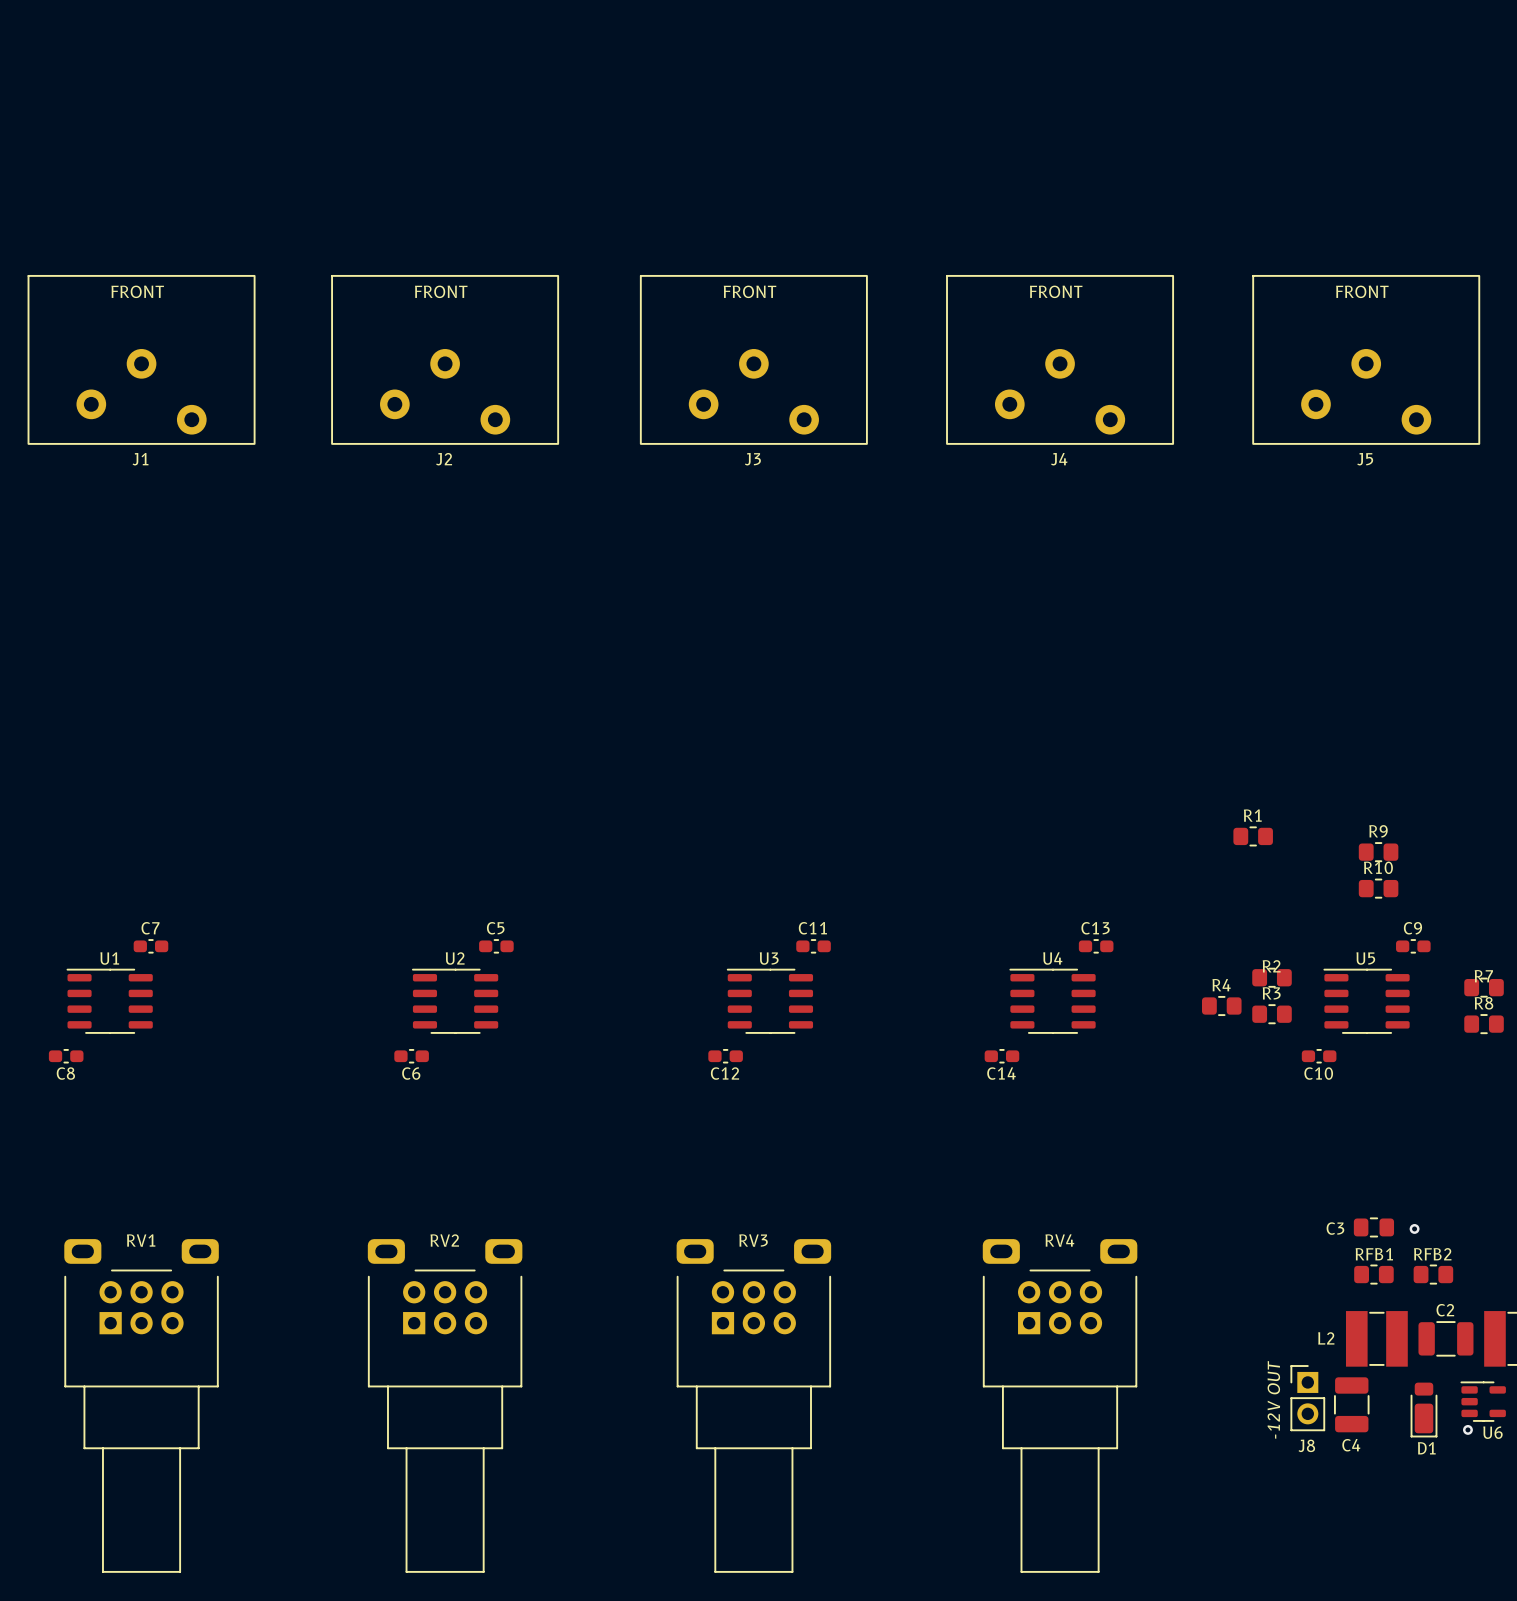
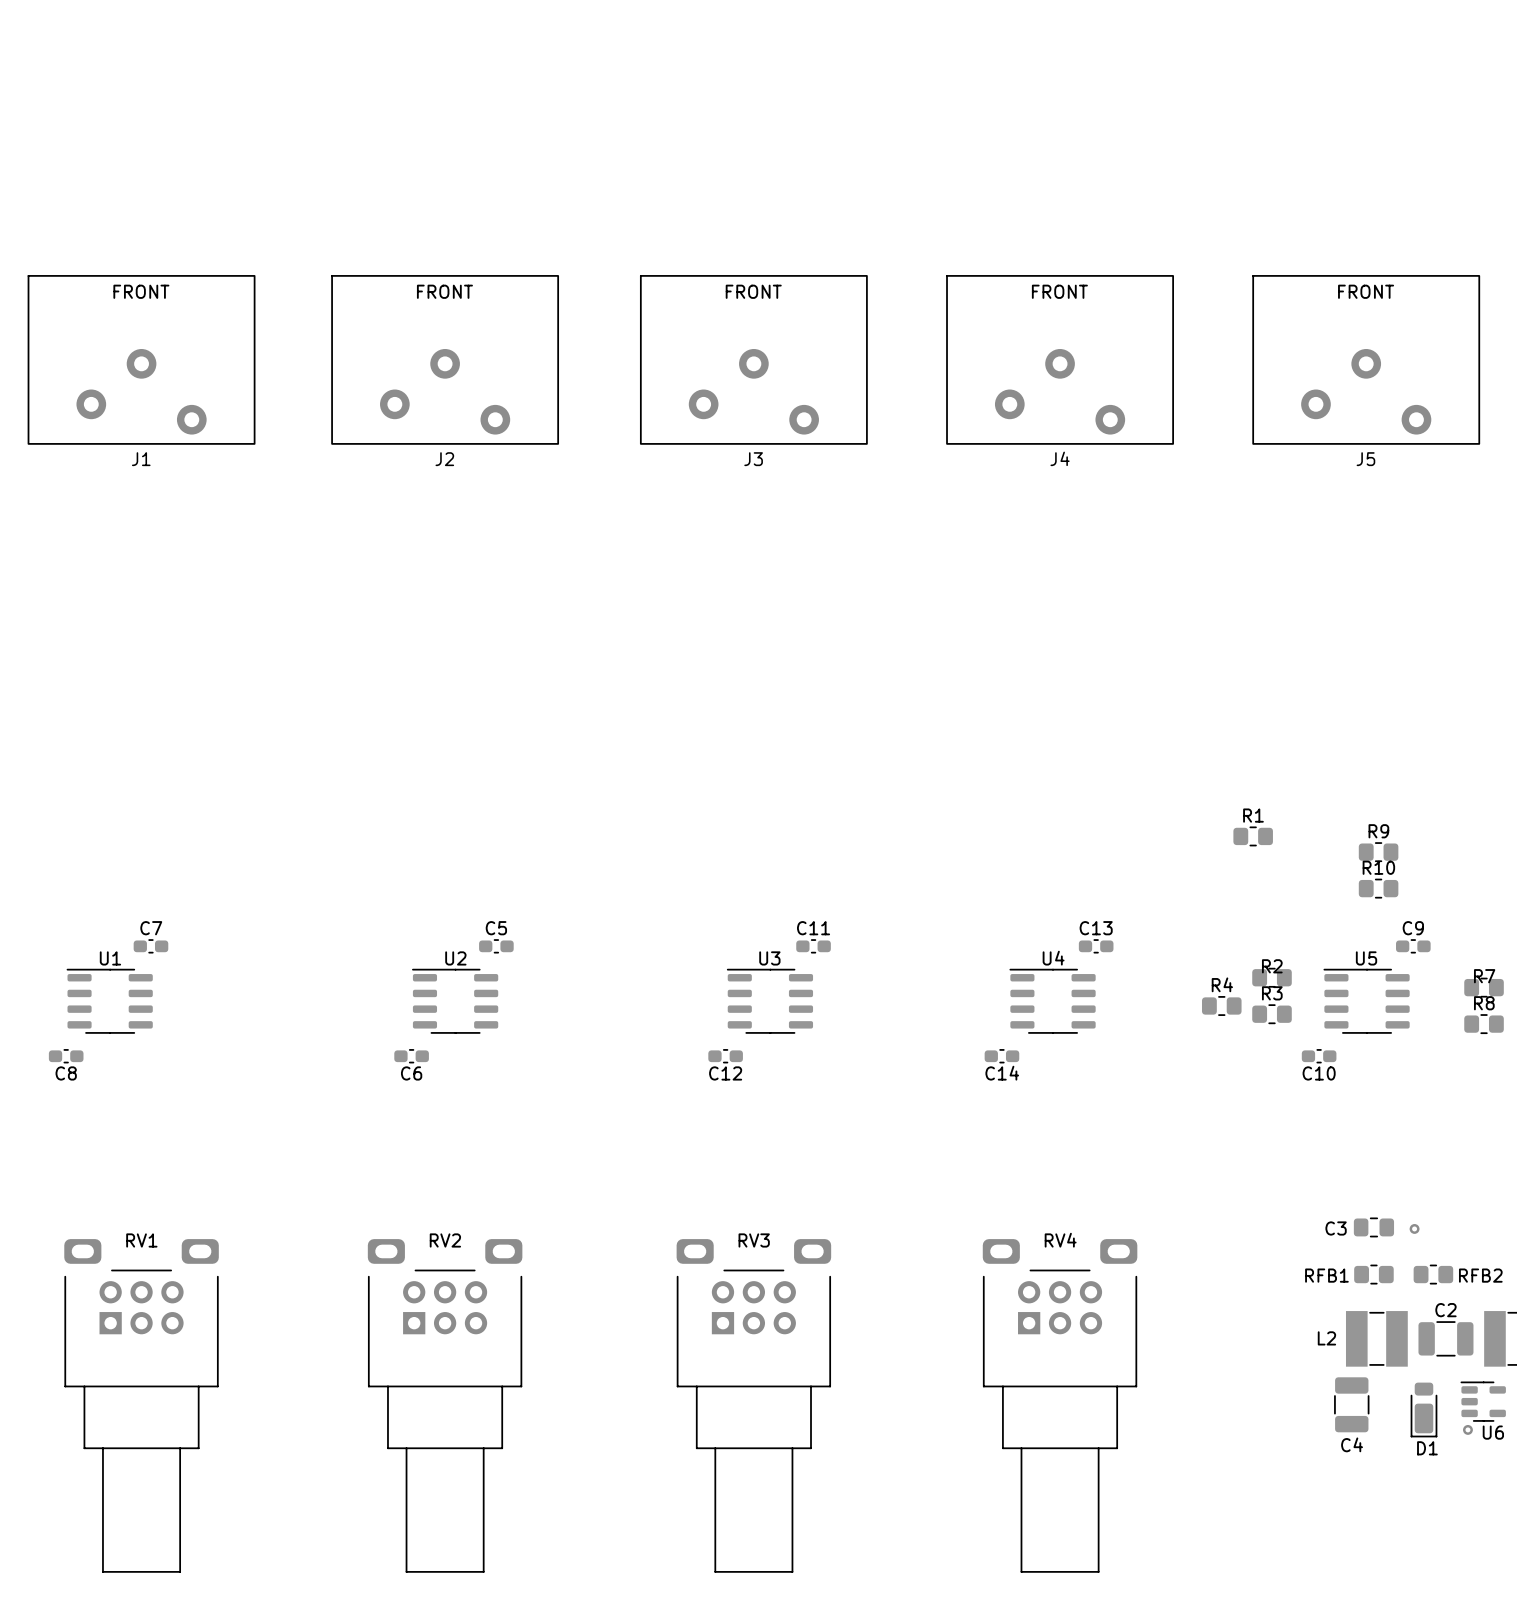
RFB1 name position: RFB1 (1374, 1254) -> RFB1 (1326, 1275)
RFB2 name position: RFB2 (1432, 1254) -> RFB2 (1480, 1275)
J8: (1307, 1398) -> none

